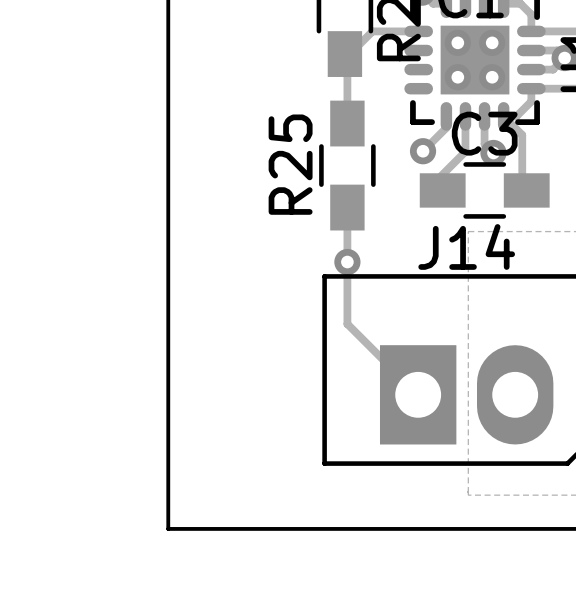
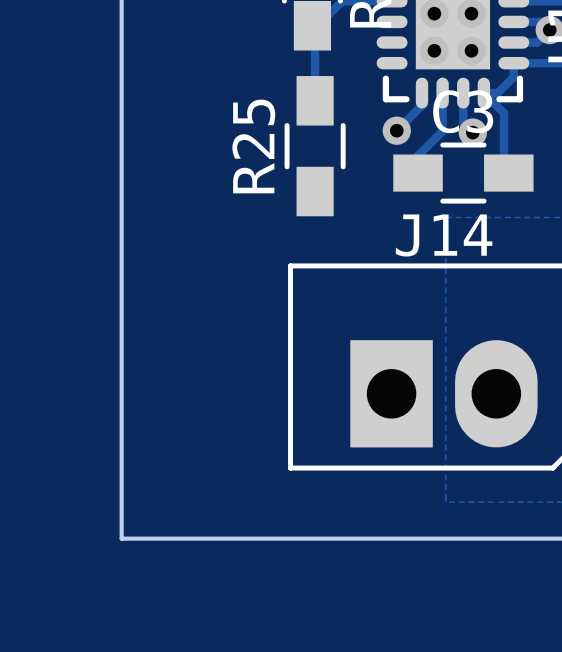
track: (347, 207) (347, 324) (418, 394) -> none
via: (347, 262) -> none

